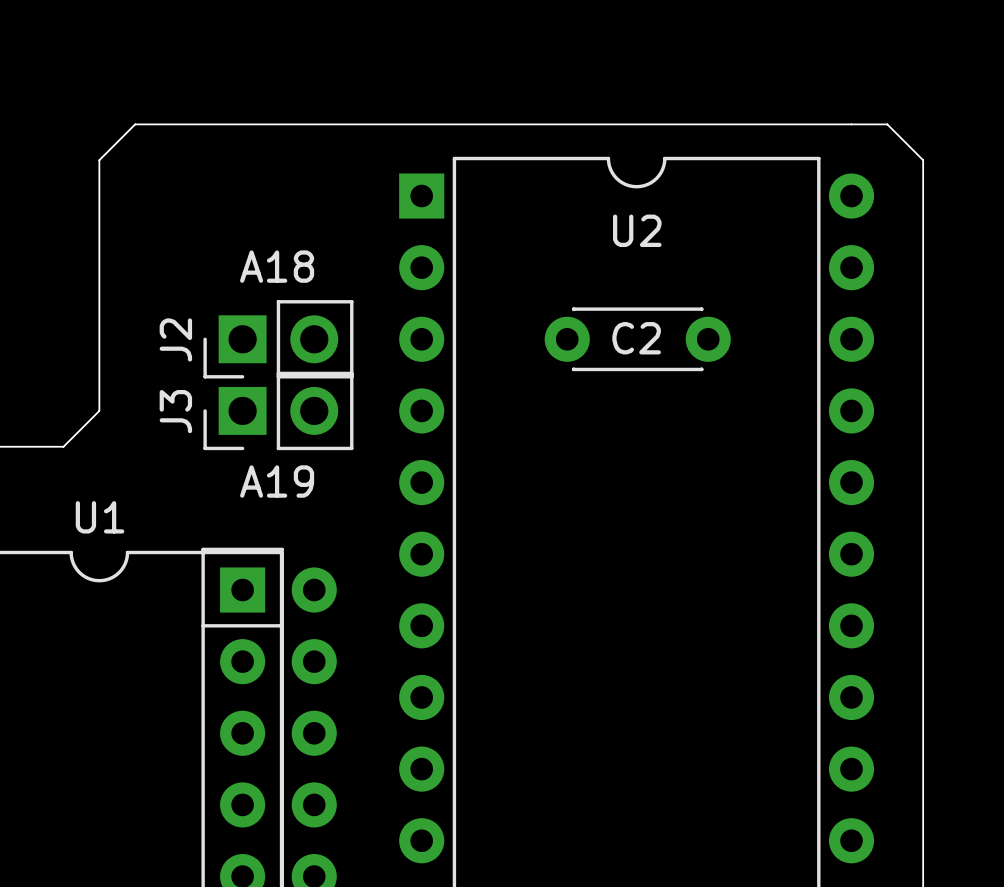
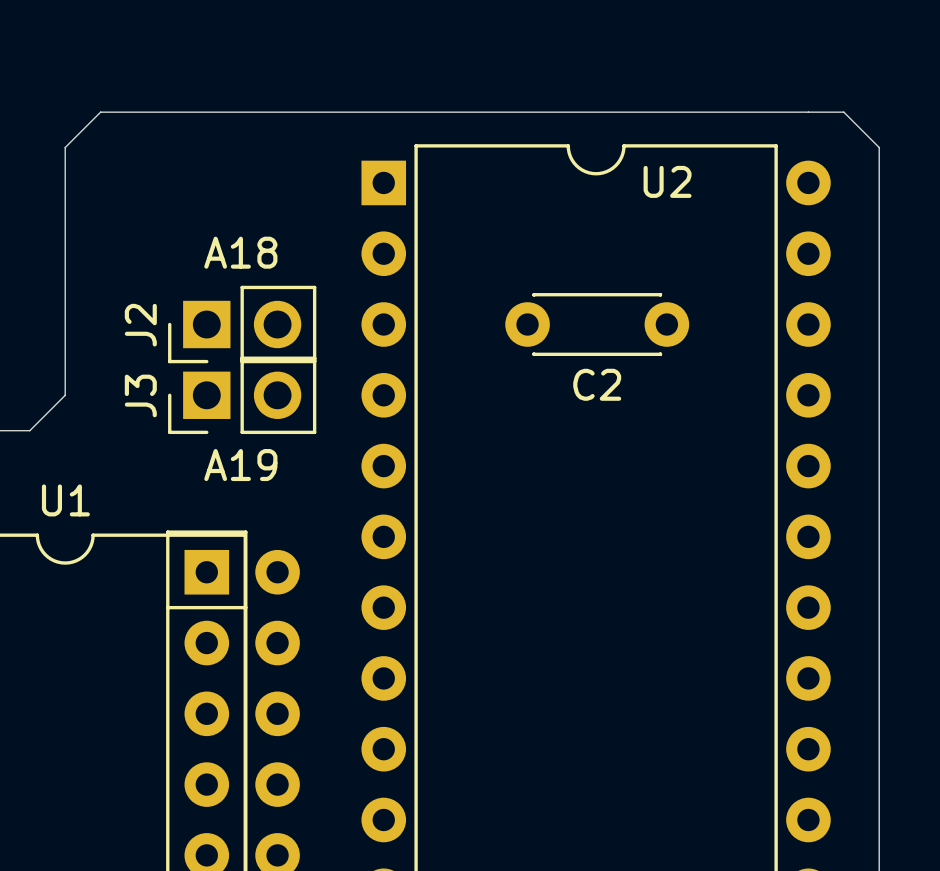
U2 name position: U2 (637, 230) -> U2 (667, 181)
C2 name position: C2 (636, 338) -> C2 (597, 384)

